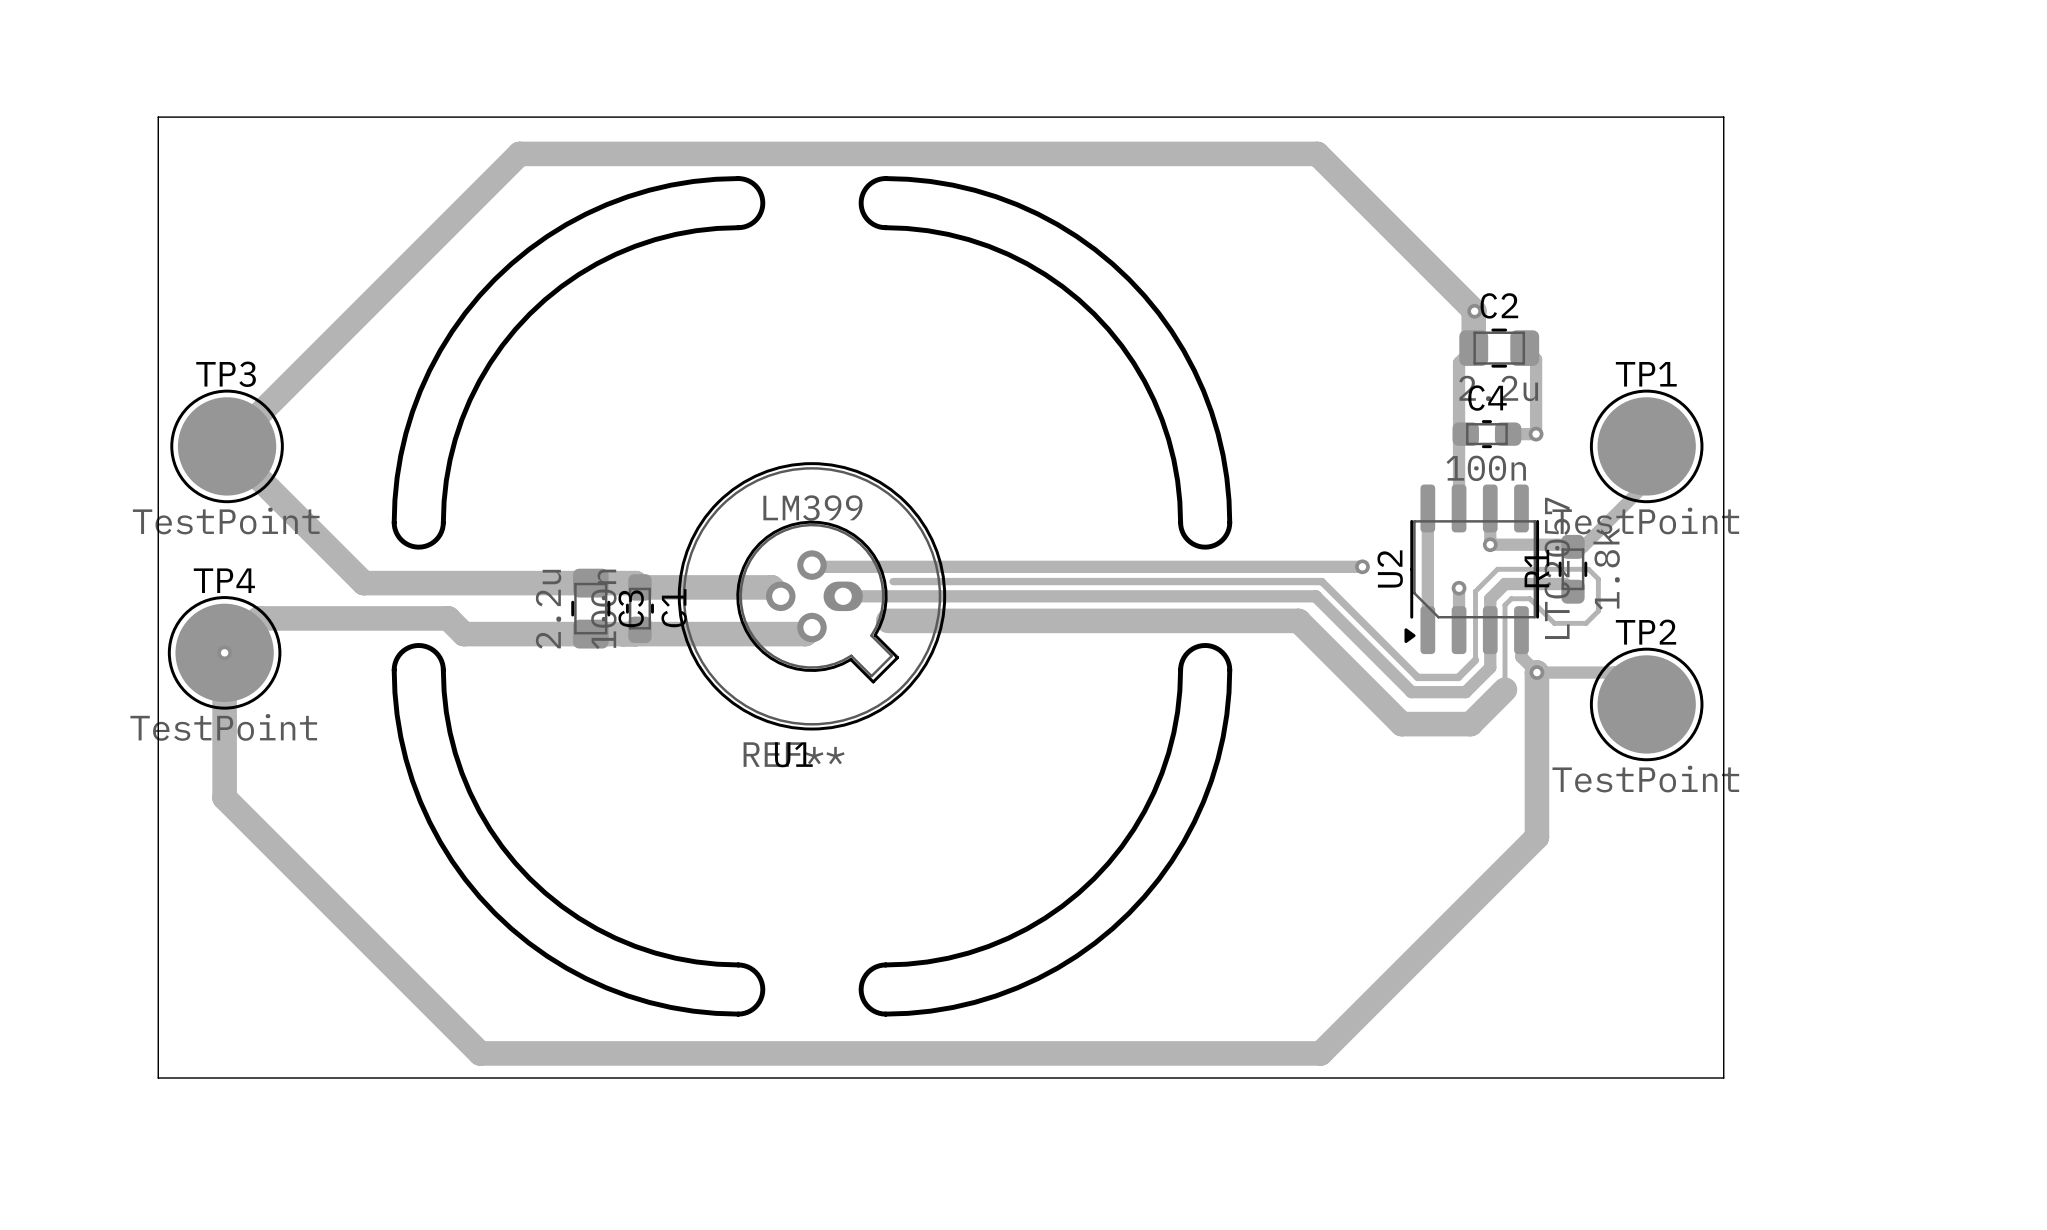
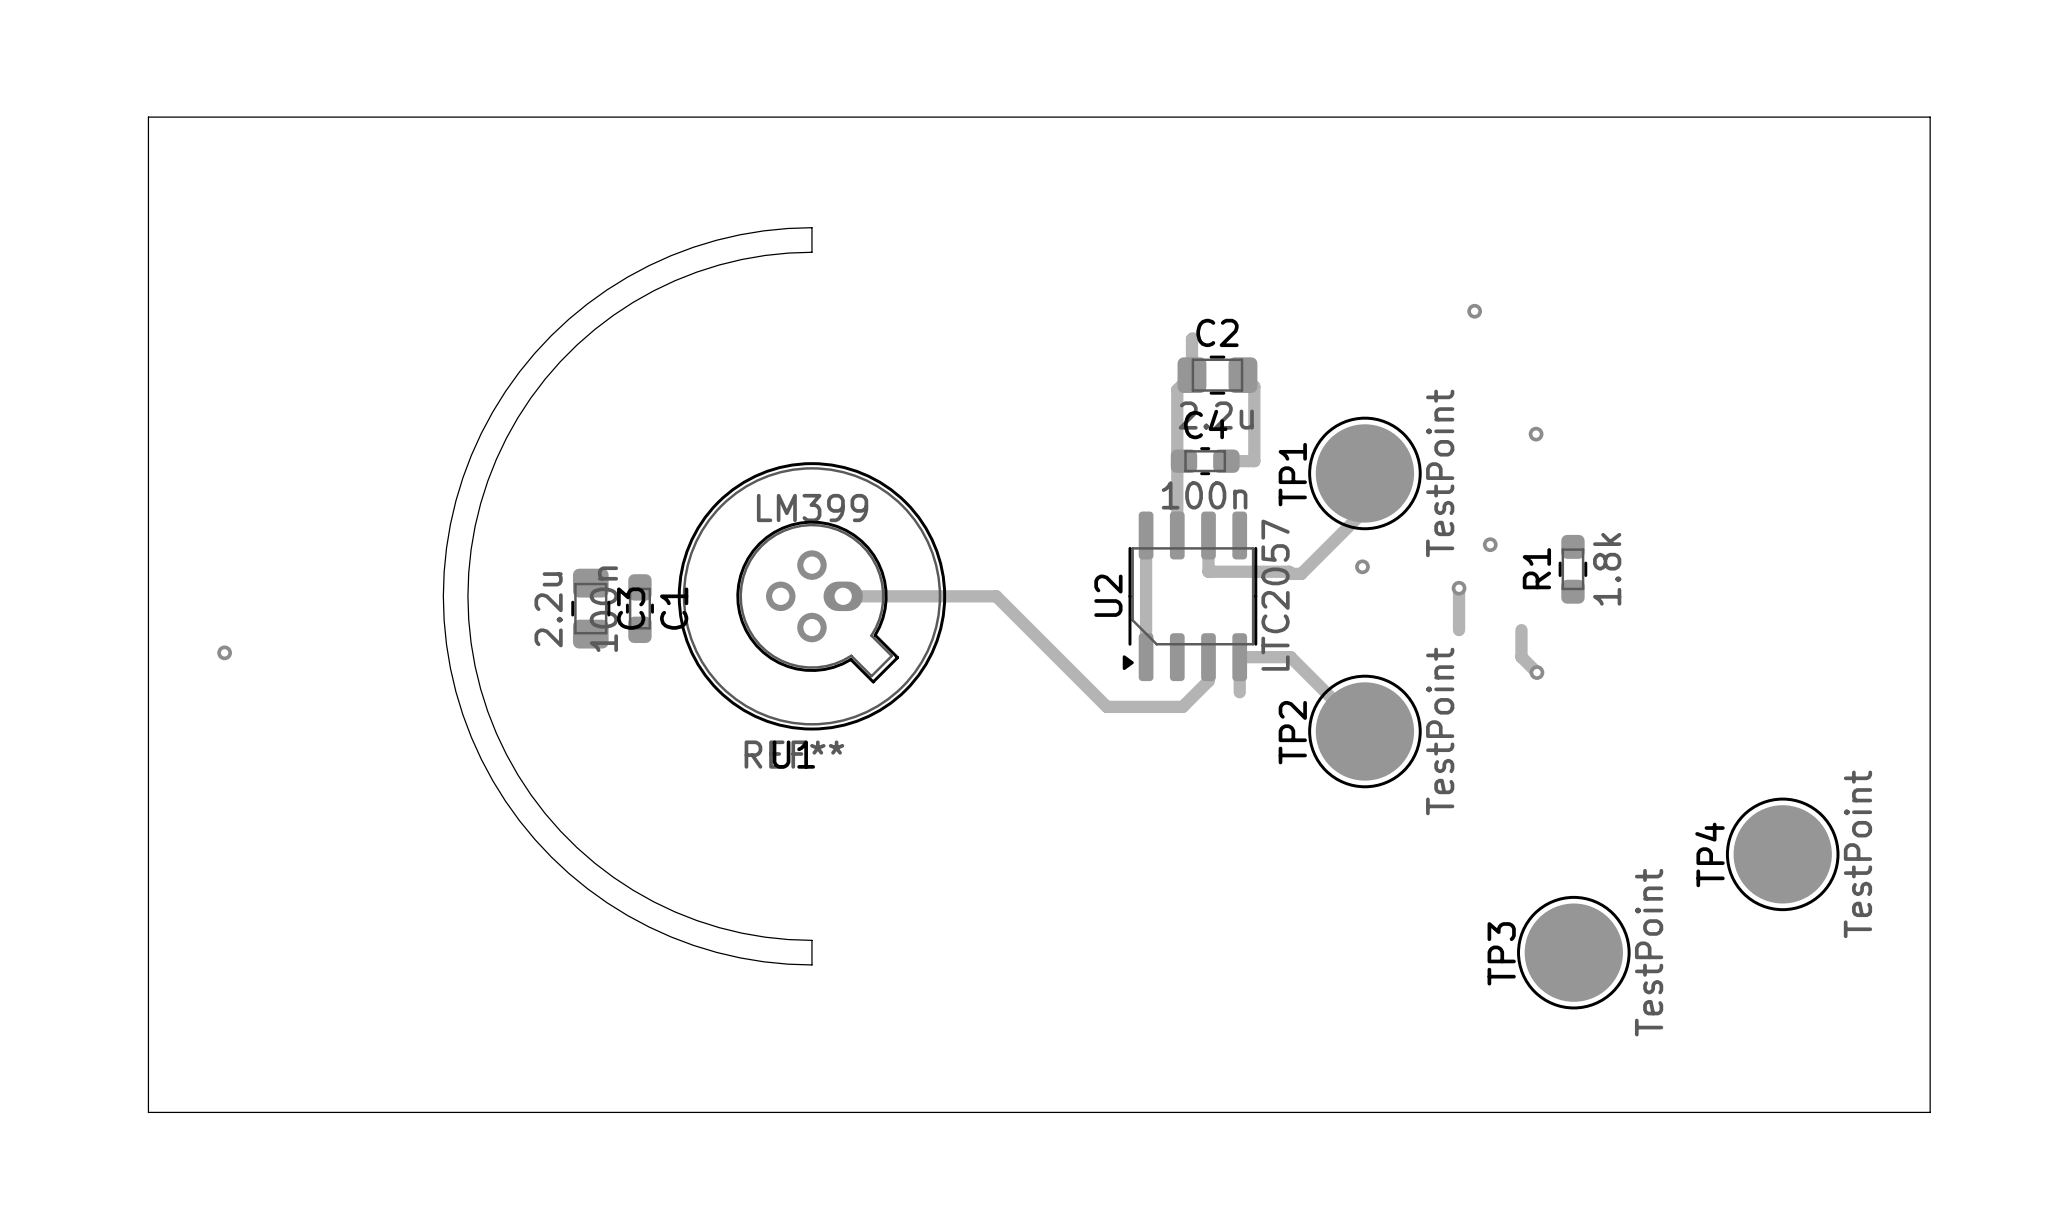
board edge: (158, 117) (158, 1078) (1723, 1078) (1723, 117) -> (158, 117) (148, 117) (148, 1112) (1930, 1112) (1930, 117) (1723, 117)
board edge: (738, 178) (753, 183) (761, 196) (760, 212) (750, 224) (741, 227) (717, 228) (675, 234) (635, 246) (596, 263) (578, 274) (561, 286) (529, 314) (502, 345) (490, 363) (469, 400) (461, 419) (450, 459) (444, 501) (443, 525) (440, 534) (433, 542) (421, 546) (409, 545) (401, 539) (394, 525) (394, 500) (400, 455) (412, 412) (440, 350) (479, 295) (528, 249) (586, 214) (627, 196) (671, 185) (738, 178) -> none
board edge: (885, 178) (870, 183) (861, 196) (862, 212) (873, 224) (882, 227) (906, 228) (948, 234) (988, 246) (1027, 263) (1045, 274) (1062, 286) (1094, 314) (1121, 345) (1133, 363) (1144, 381) (1162, 419) (1173, 459) (1179, 501) (1180, 525) (1183, 534) (1190, 542) (1201, 546) (1214, 545) (1222, 539) (1229, 525) (1229, 500) (1223, 455) (1211, 412) (1183, 350) (1144, 295) (1095, 249) (1057, 224) (1017, 204) (952, 185) (885, 178) -> none
board edge: none -> (811, 227) (811, 252) (788, 253) (741, 259) (696, 272) (674, 280) (653, 290) (613, 315) (577, 344) (560, 361) (545, 379) (518, 417) (496, 459) (480, 503) (475, 526) (468, 572) (467, 596) (468, 619) (475, 666) (480, 689) (496, 733) (518, 775) (530, 794) (560, 831) (577, 847) (613, 877) (633, 890) (674, 911) (696, 920) (741, 933) (788, 939) (811, 940) (811, 964) (787, 964) (740, 957) (693, 945) (670, 936) (648, 926) (607, 902) (568, 873) (551, 856) (519, 820) (505, 801) (492, 780) (471, 737) (462, 714) (450, 668) (446, 644) (443, 596) (446, 548) (450, 524) (455, 500) (471, 455) (492, 412) (505, 391) (519, 371) (551, 335) (568, 319) (607, 289) (648, 265) (670, 255) (693, 247) (740, 234) (787, 228) (811, 227)
track: none -> (1192, 338) (1191, 375) (1177, 389) (1177, 535)
C2 position: (1499, 348) -> (1217, 375)
track: (1524, 348) (1536, 359) (1536, 434) (1508, 434) -> (1242, 375) (1254, 386) (1254, 461) (1226, 461)
TP3 name rotation: 0° (226, 374) -> 90° counterclockwise (1501, 953)
TP3 name position: TP3 (226, 374) -> TP3 (1501, 953)
TP1 name rotation: 0° (1646, 374) -> 90° counterclockwise (1292, 474)
TP1 name position: TP1 (1646, 374) -> TP1 (1292, 474)
C4 position: (1486, 434) -> (1205, 461)
TP3 position: (227, 446) -> (1573, 952)
track: (1646, 446) (1646, 483) (1583, 546) (1572, 546) (1570, 544) (1490, 544) (1490, 508) -> (1364, 473) (1364, 510) (1301, 573) (1291, 573) (1289, 571) (1208, 571) (1208, 535)
TP1 position: (1646, 446) -> (1364, 473)
track: (1427, 508) (1427, 630) -> (1146, 535) (1146, 657)
track: (1459, 508) (1459, 362) (1473, 348) (1474, 311) (1317, 153) (519, 153) (227, 446) (363, 583) (635, 583) (639, 587) (771, 587) (780, 596) -> none
TP3 value rotation: 0° (226, 521) -> 90° counterclockwise (1649, 952)
TP1 value rotation: 0° (1645, 521) -> 90° counterclockwise (1440, 473)
track: (811, 565) (813, 566) (1362, 566) -> none
U2 position: (1471, 569) -> (1190, 596)
TP4 name rotation: 0° (224, 580) -> 90° counterclockwise (1709, 854)
TP4 name position: TP4 (224, 580) -> TP4 (1709, 854)
track: (893, 581) (1321, 581) (1417, 677) (1458, 677) (1475, 660) (1475, 591) (1497, 569) (1588, 569) (1598, 579) (1598, 611) (1586, 623) (1554, 623) (1529, 598) (1511, 598) (1505, 605) (1505, 689) (1470, 724) (1401, 724) (1298, 620) (888, 620) -> none
track: (1572, 591) (1565, 584) (1505, 584) (1490, 598) (1490, 667) (1465, 692) (1411, 692) (1315, 596) (996, 596) -> (1208, 657) (1208, 681) (1182, 706) (1106, 706) (996, 596)
track: (811, 627) (805, 634) (463, 634) (448, 618) (259, 618) (224, 652) (224, 797) (480, 1053) (1320, 1053) (1536, 837) (1536, 672) (1614, 672) (1646, 704) -> none
TP2 name rotation: 0° (1646, 632) -> 90° counterclockwise (1292, 732)
TP2 name position: TP2 (1646, 632) -> TP2 (1292, 732)
TP4 position: (224, 652) -> (1782, 854)
board edge: (394, 670) (399, 655) (412, 646) (428, 647) (440, 657) (443, 666) (444, 691) (450, 732) (461, 773) (479, 811) (490, 829) (502, 846) (529, 878) (561, 906) (578, 918) (615, 938) (635, 946) (675, 958) (717, 964) (741, 965) (750, 968) (757, 974) (762, 986) (761, 995) (755, 1006) (741, 1013) (715, 1013) (671, 1007) (627, 995) (566, 968) (511, 928) (465, 879) (429, 822) (405, 759) (397, 714) (394, 670) -> none
board edge: (1180, 670) (1185, 655) (1195, 647) (1208, 645) (1222, 652) (1229, 666) (1226, 714) (1211, 780) (1194, 822) (1171, 861) (1144, 896) (1112, 928) (1076, 956) (1017, 987) (974, 1002) (930, 1011) (882, 1013) (868, 1006) (861, 995) (861, 986) (866, 974) (873, 968) (882, 965) (906, 964) (948, 958) (968, 953) (1008, 938) (1045, 918) (1062, 906) (1094, 878) (1108, 863) (1133, 829) (1153, 792) (1162, 773) (1168, 753) (1177, 712) (1180, 670) -> none
track: none -> (1239, 692) (1239, 657) (1290, 657) (1364, 731)
TP2 position: (1646, 704) -> (1364, 731)
TP4 value rotation: 0° (223, 727) -> 90° counterclockwise (1857, 854)
TP2 value rotation: 0° (1645, 779) -> 90° counterclockwise (1440, 731)

